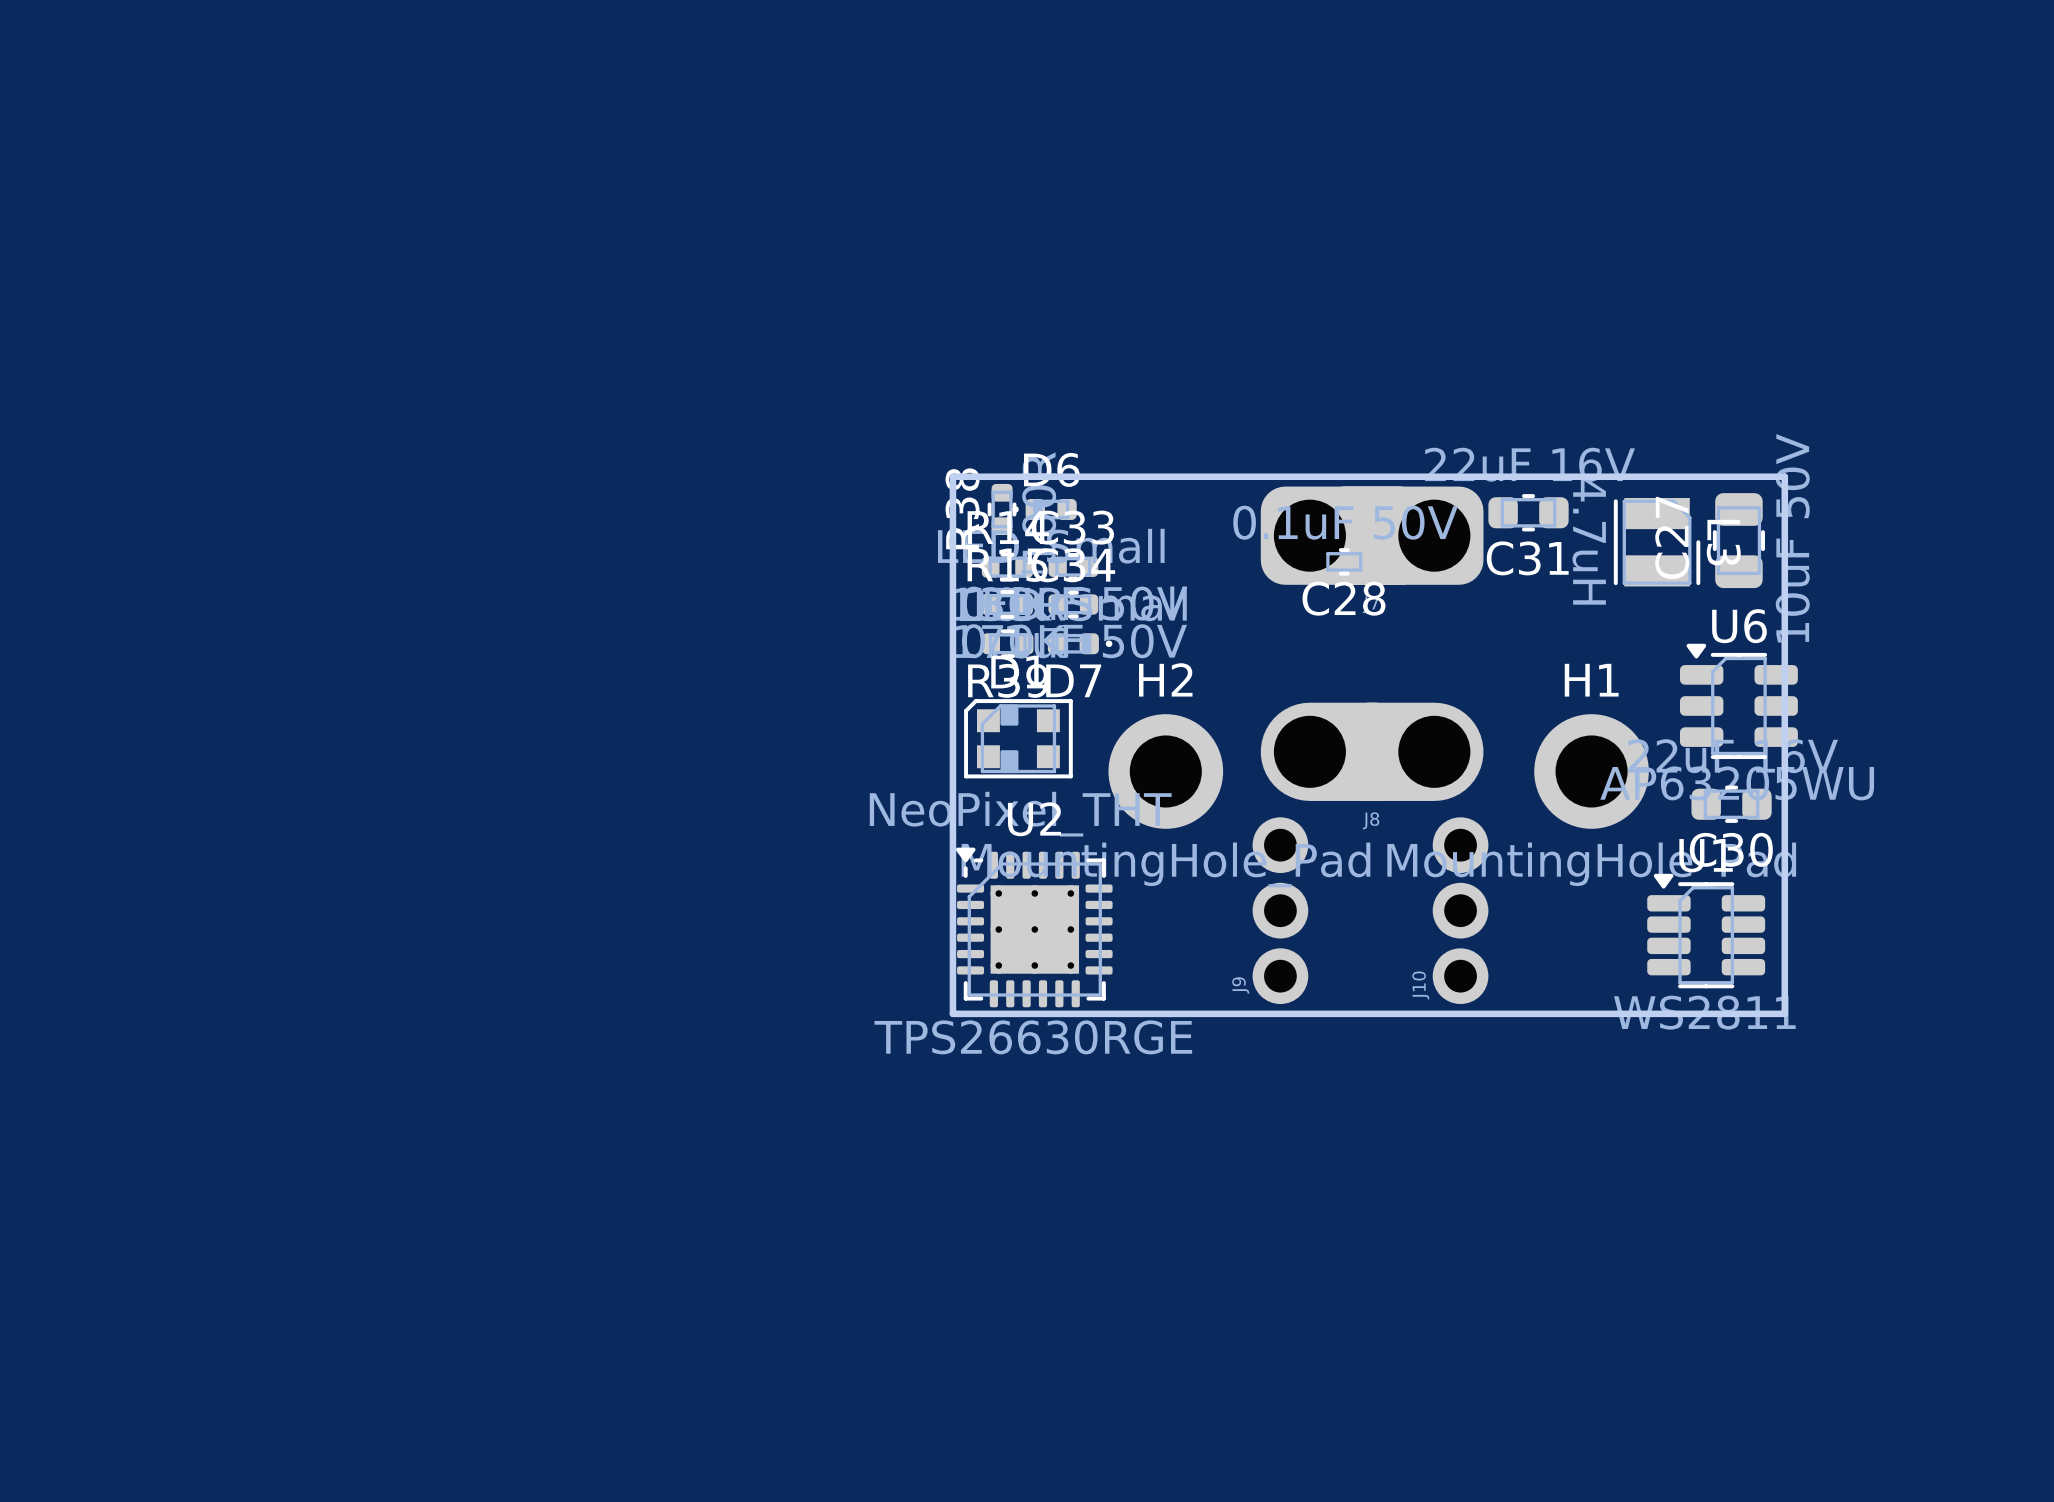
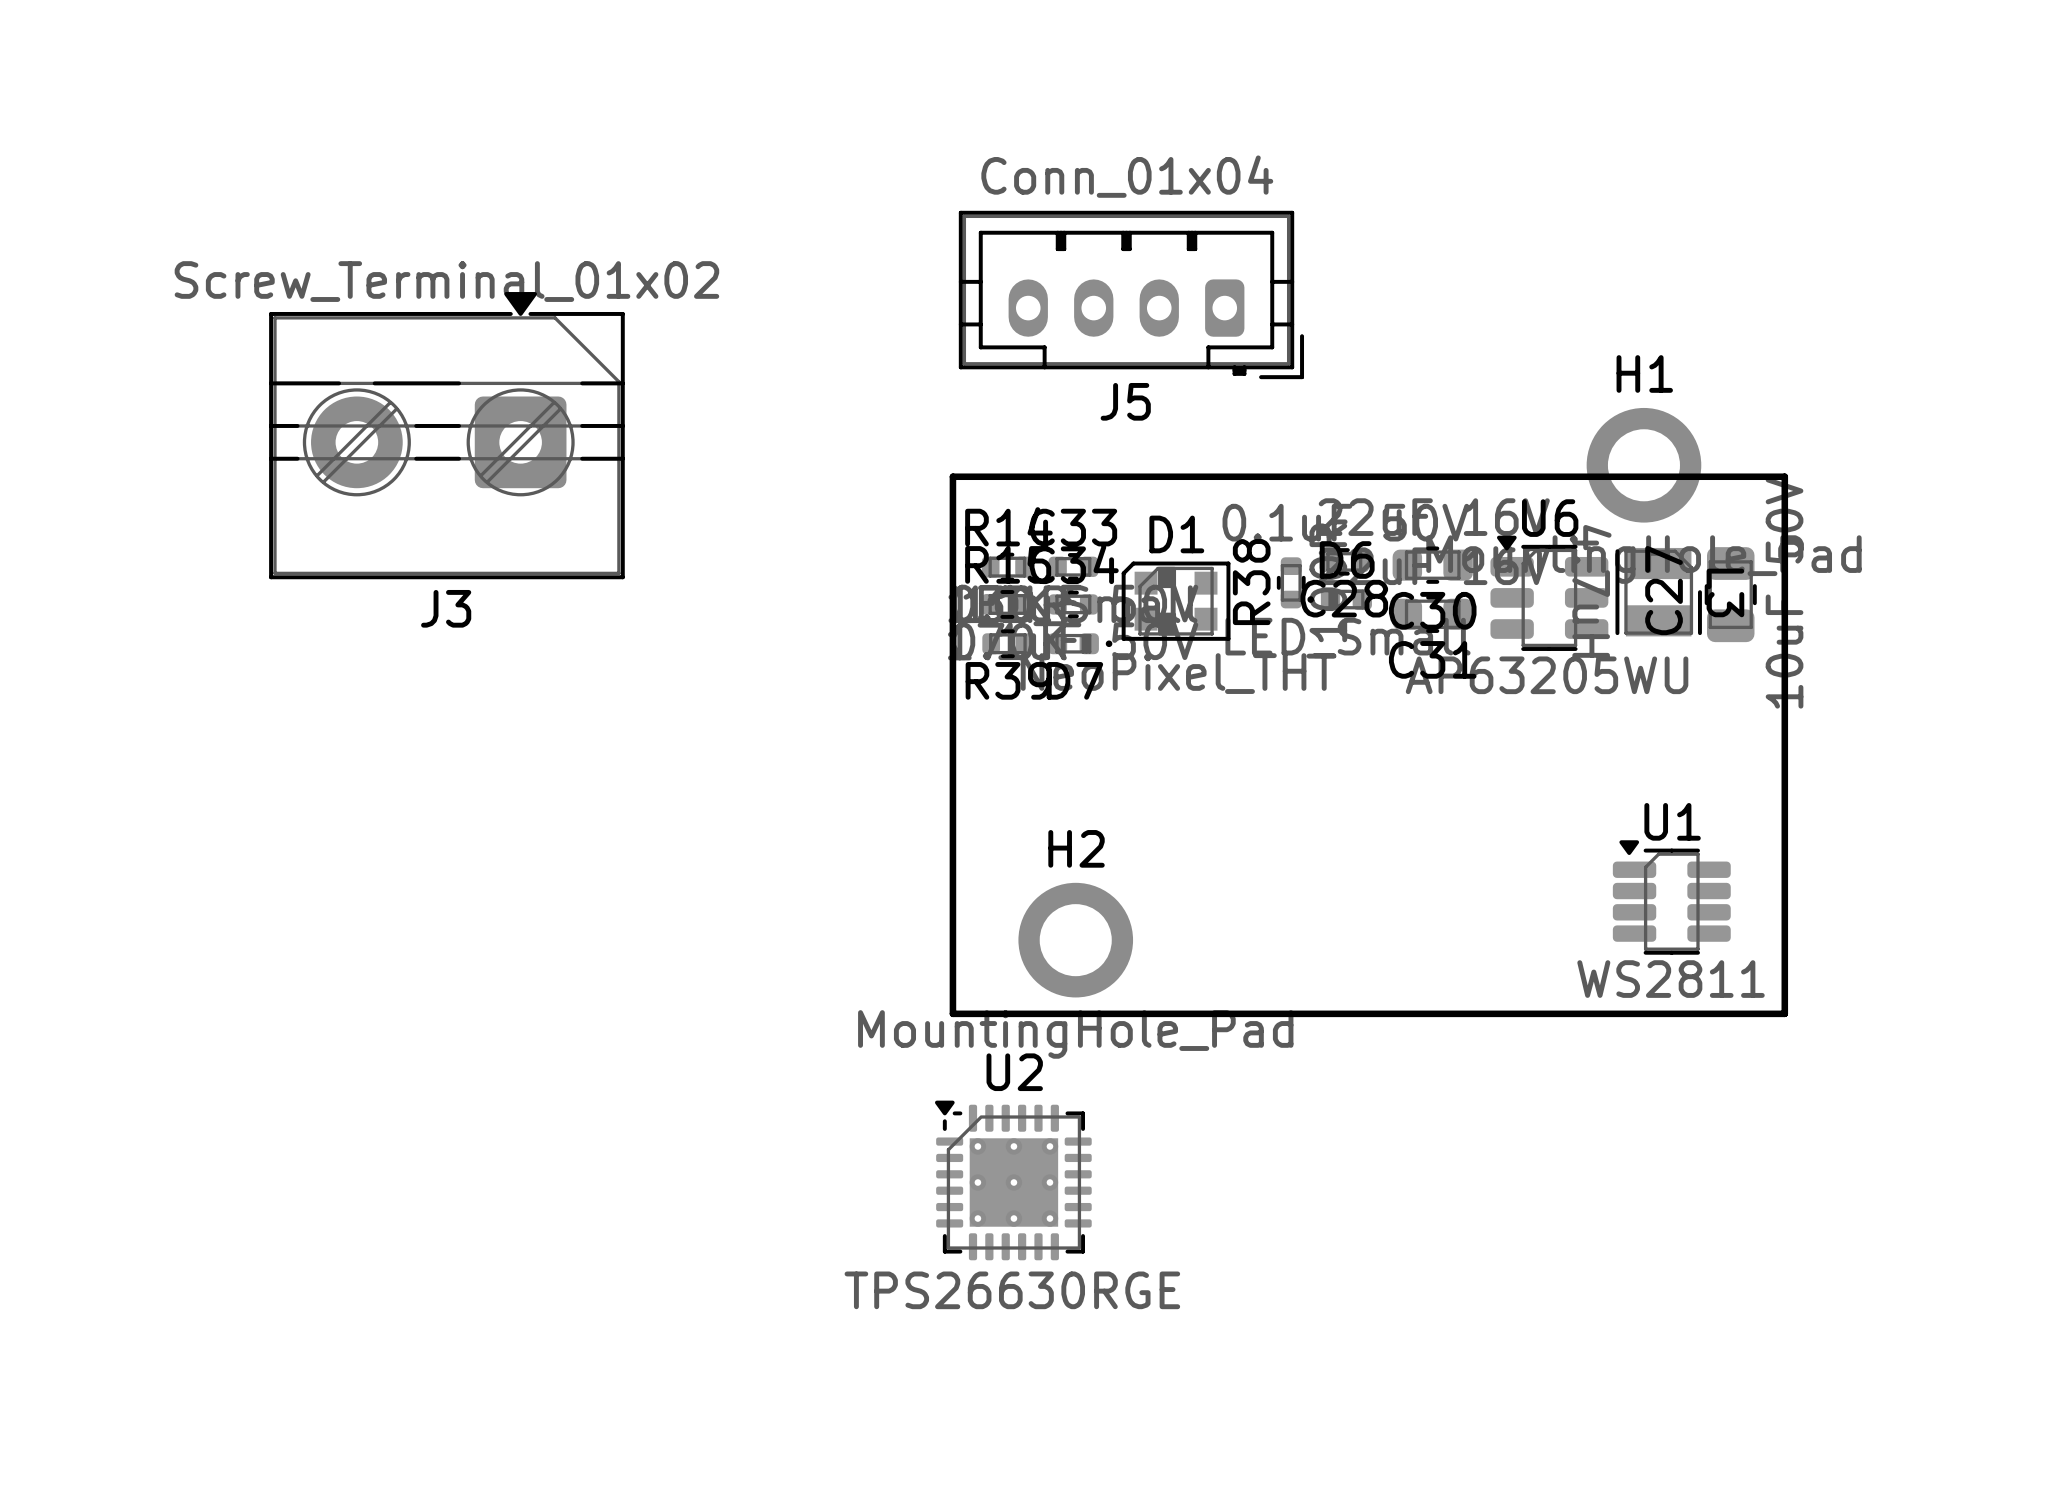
J5: none -> Conn_01x04 (1131, 294)
J3: none -> Screw_Terminal_01x02 (446, 435)
R38 position: (1002, 509) -> (1291, 582)
D6 position: (1044, 509) -> (1339, 599)
C31 position: (1528, 512) -> (1432, 614)
part: (1372, 535) -> none
C27 position: (1738, 540) -> (1730, 594)
L3 position: (1657, 542) -> (1658, 592)
U6 position: (1738, 701) -> (1549, 593)
D1 position: (1018, 738) -> (1176, 601)
J8: (1372, 751) -> none
H2 position: (1165, 771) -> (1075, 940)
H1 position: (1591, 771) -> (1643, 465)
C30 position: (1731, 804) -> (1432, 565)
J9: (1280, 910) -> none
J10: (1460, 910) -> none
U2 position: (1034, 927) -> (1013, 1180)
U1 position: (1706, 931) -> (1671, 897)

